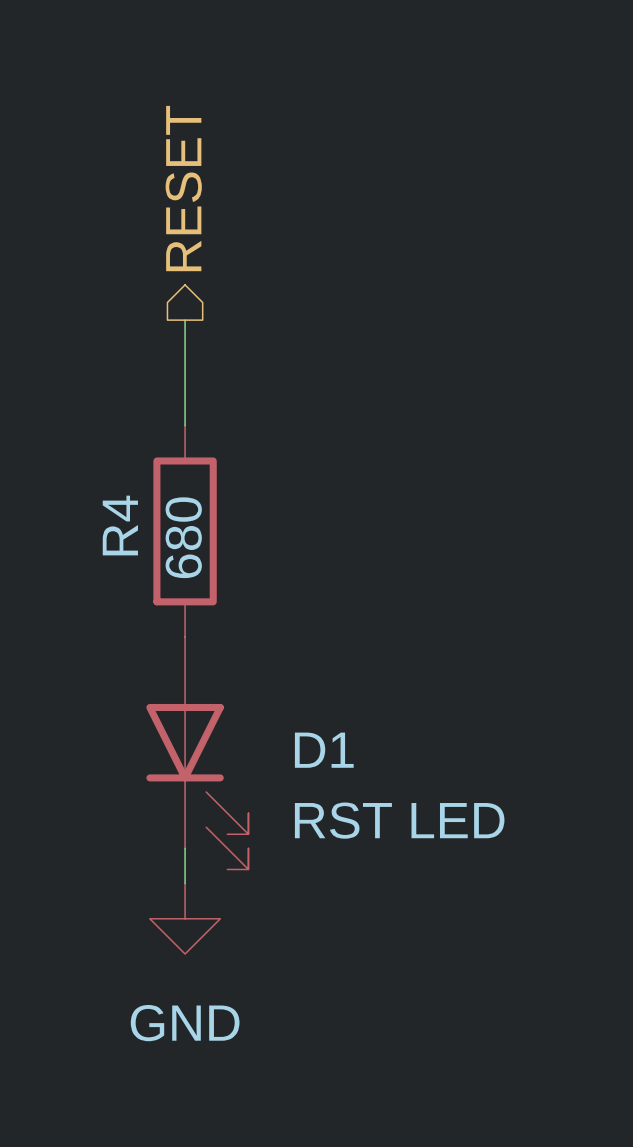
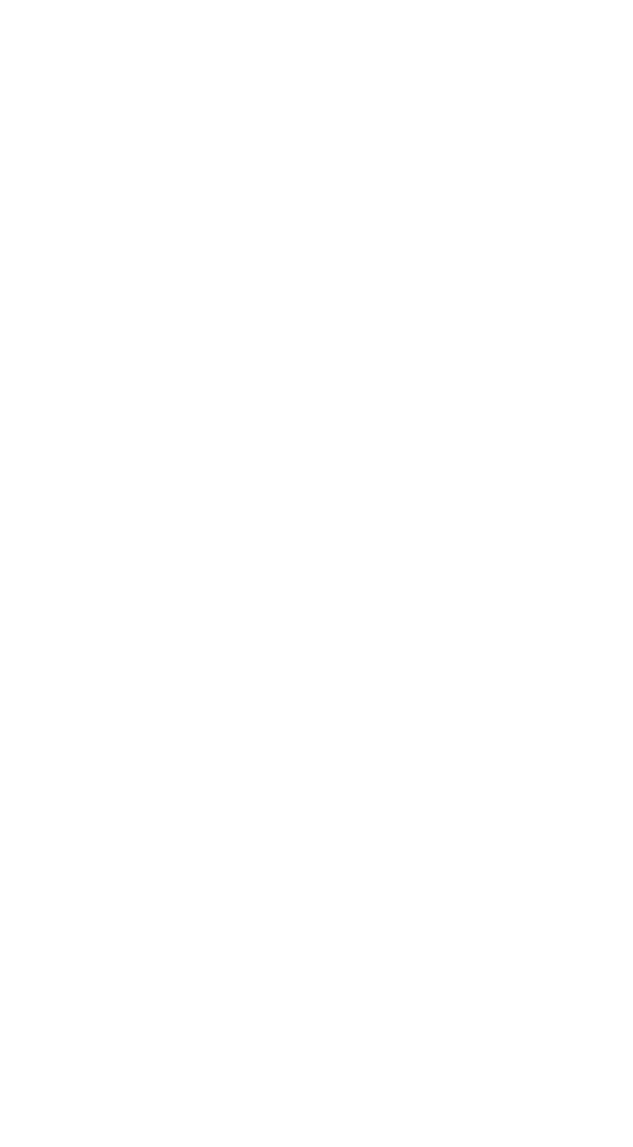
hierarchical label: RESET (183, 188) -> none
wire: (185, 320) (185, 425) -> none
R4: 680 (185, 531) -> none
D1: RST LED (197, 753) -> none
wire: (185, 848) (185, 883) -> none
power symbol: GND (185, 918) -> none

